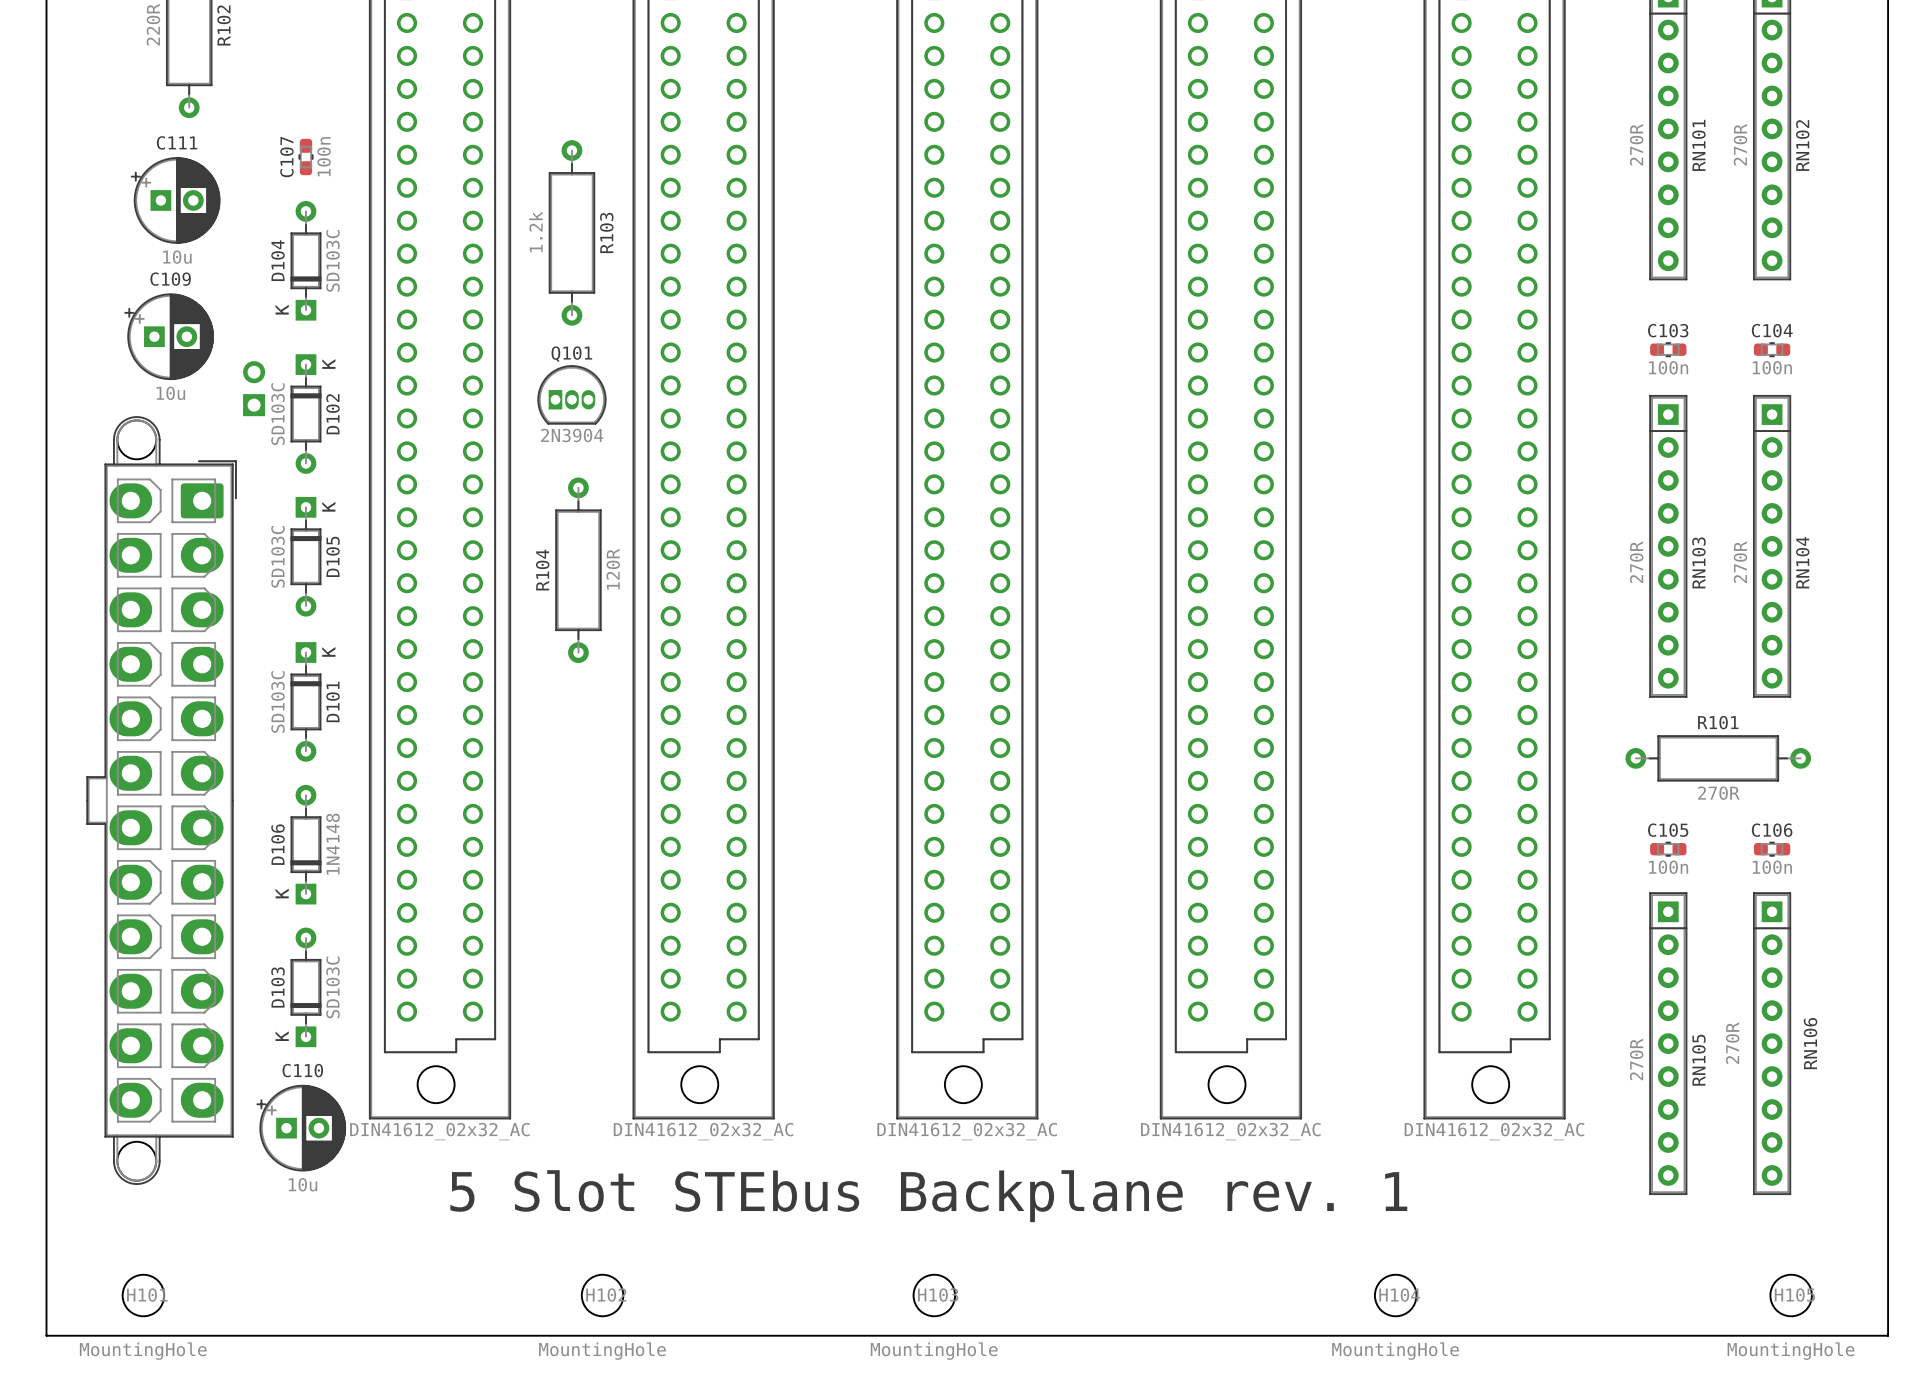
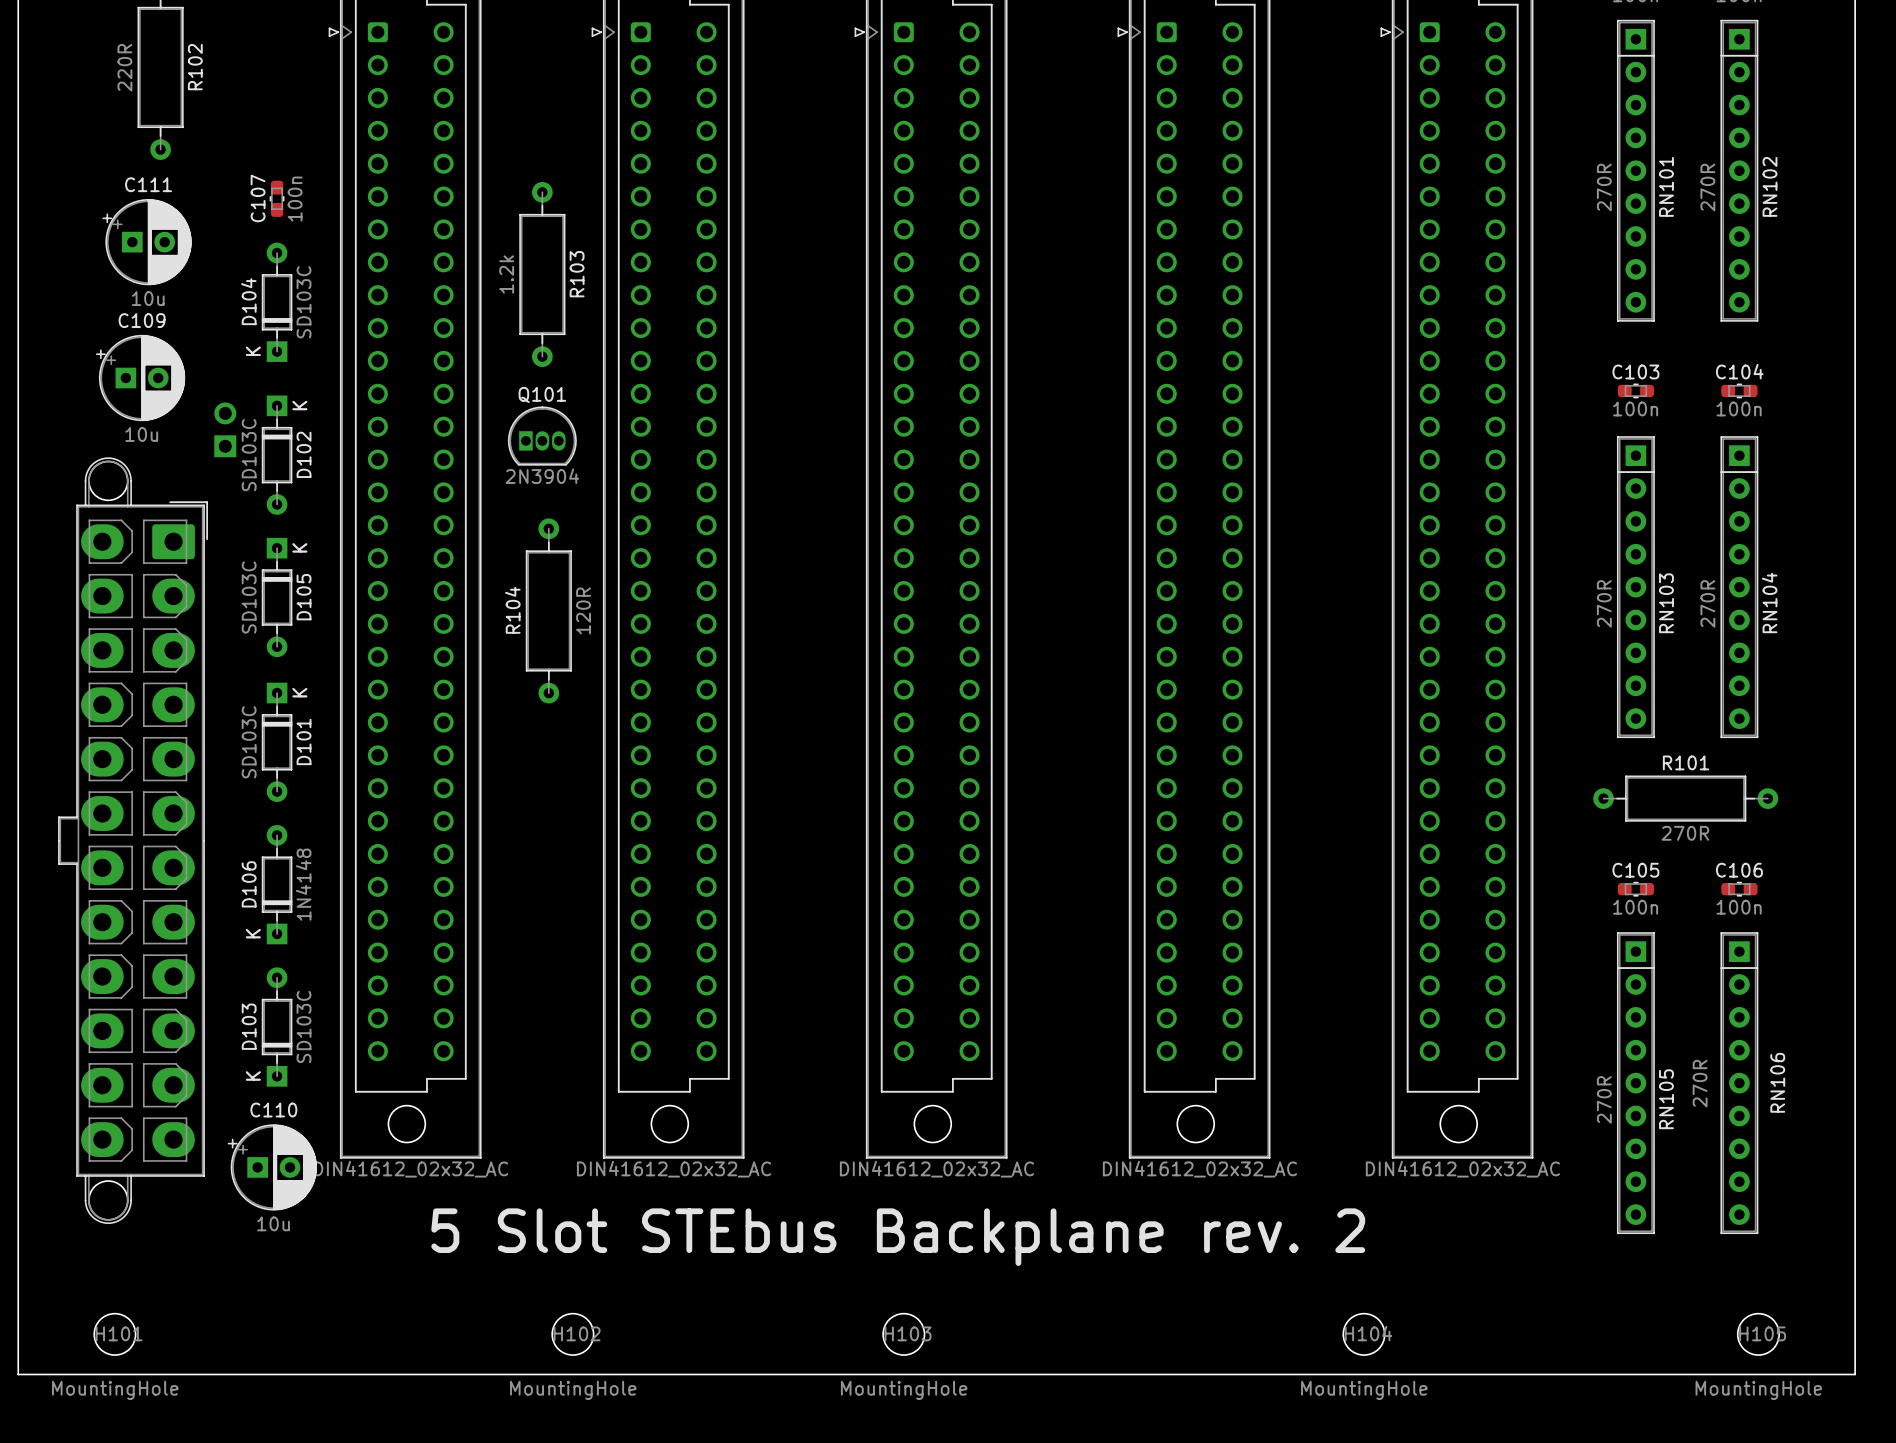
text: 5 Slot STEbus Backplane rev. 1 (928, 1196) -> 5 Slot STEbus Backplane rev. 2 (898, 1237)

